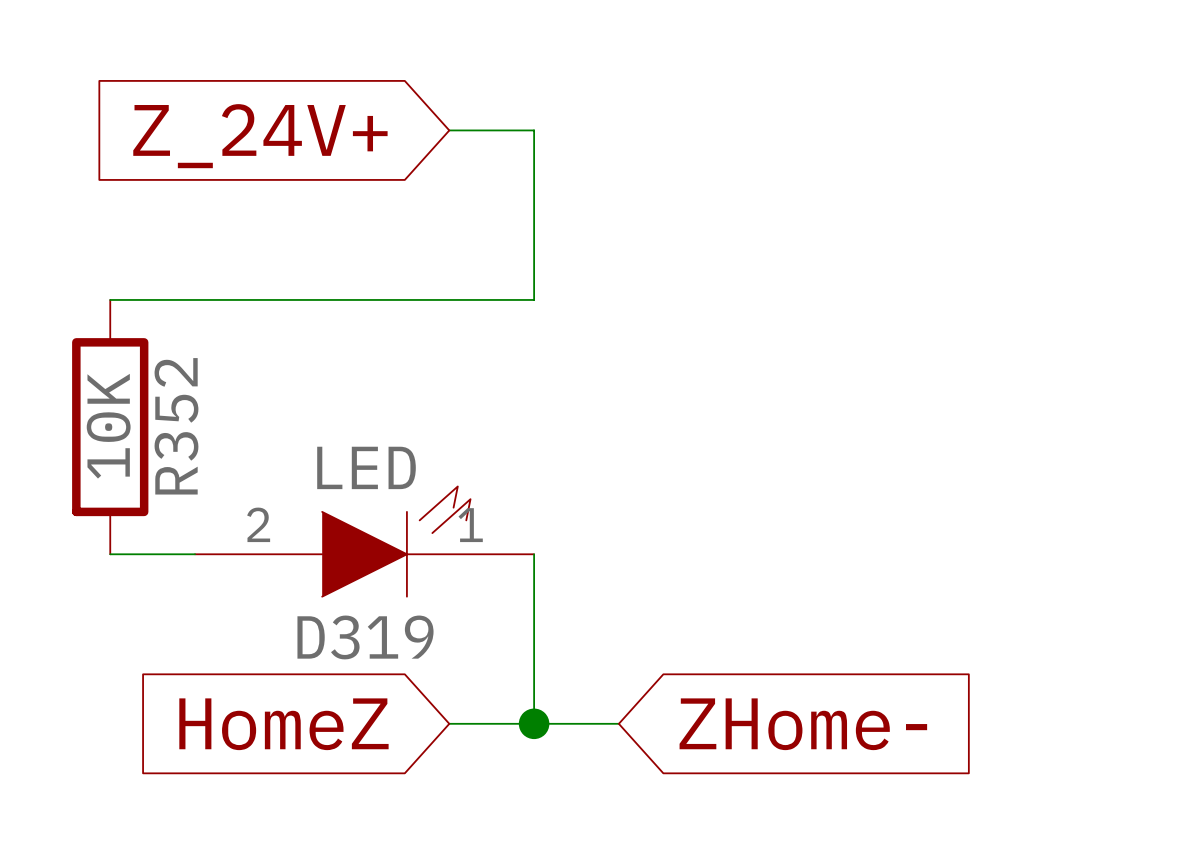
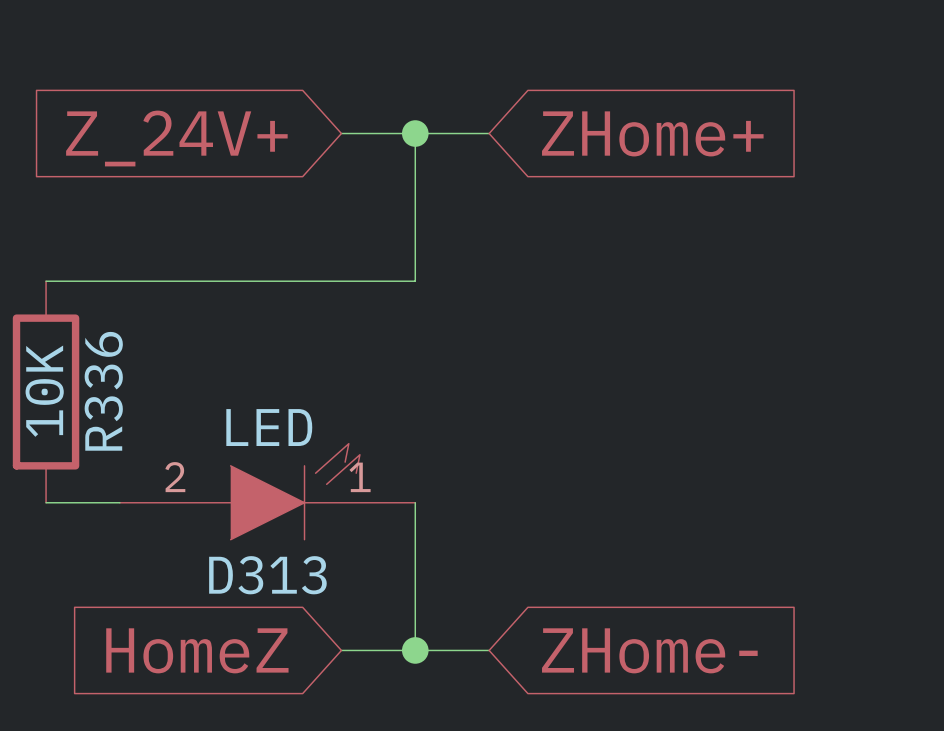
wire: none -> (415, 133) (489, 133)
junction: none -> (415, 133)
global label: none -> ZHome+ (652, 133)
R352 name: R352 (176, 426) -> R336 (103, 391)
D319 name: D319 (365, 637) -> D313 (267, 575)

